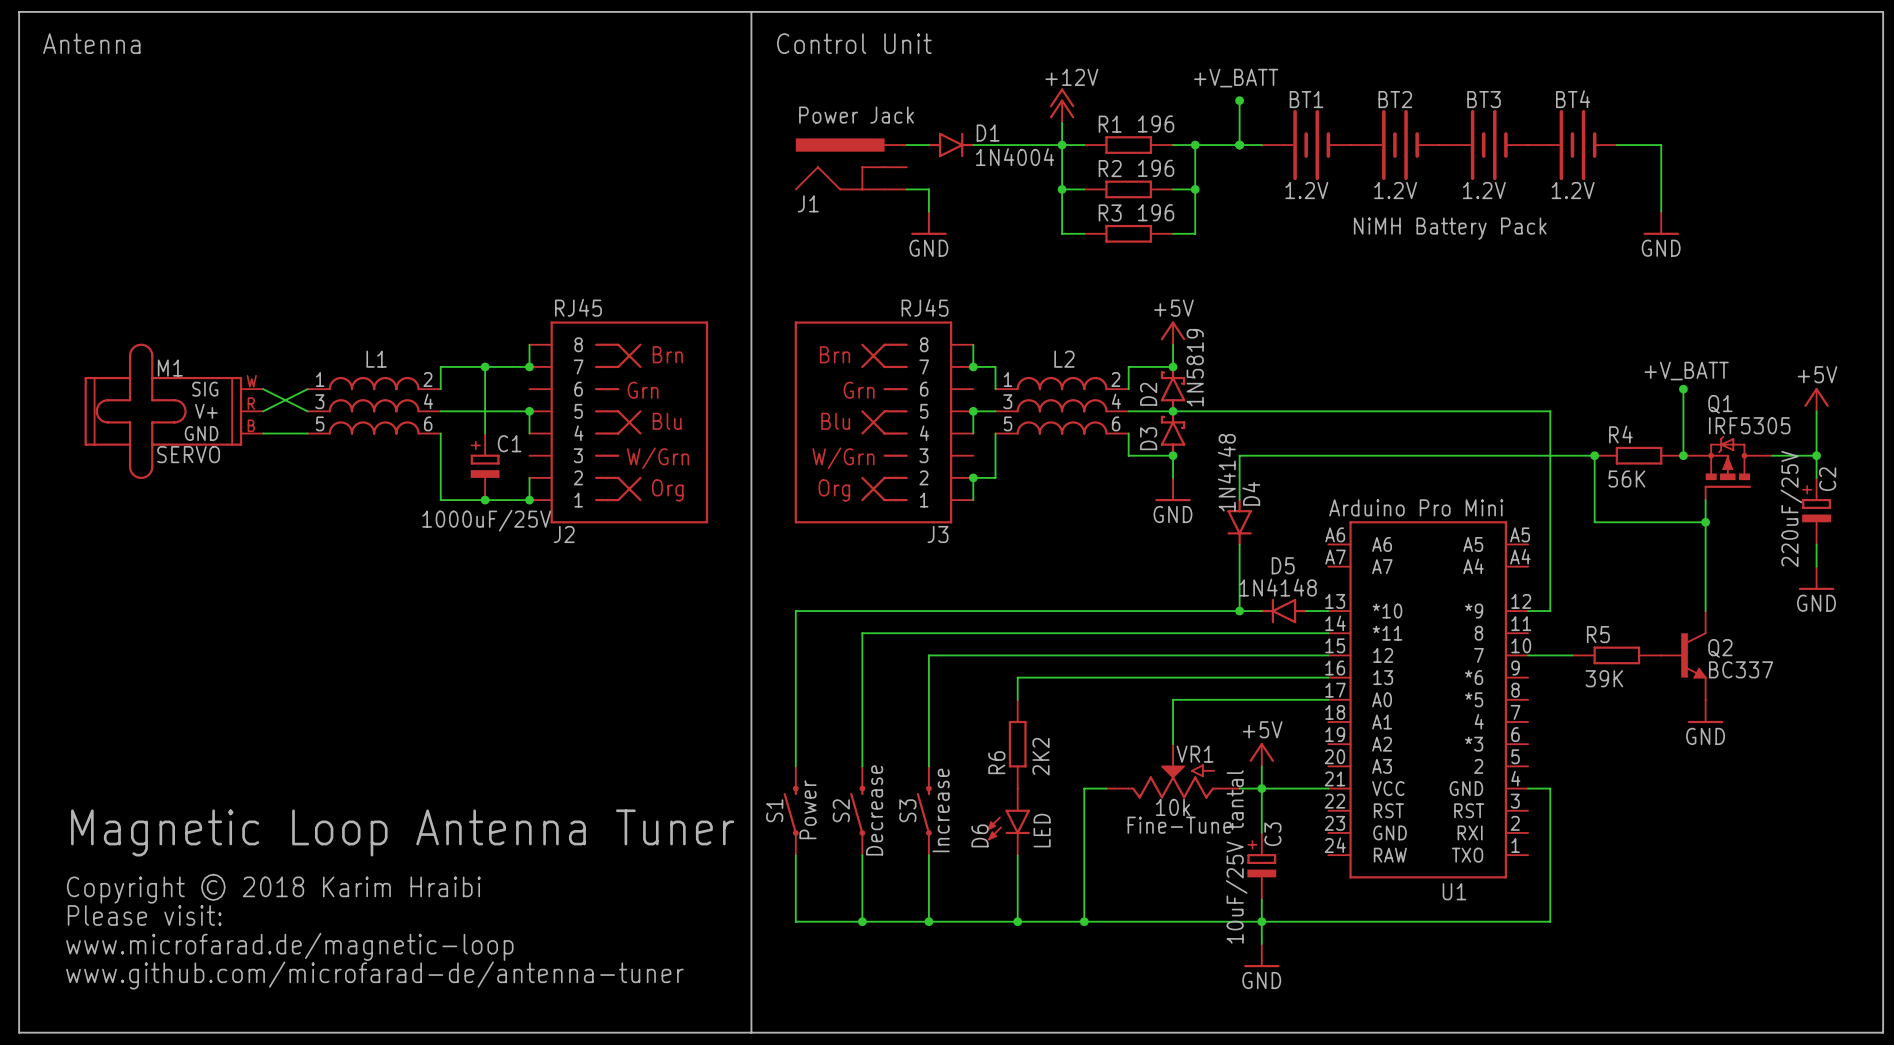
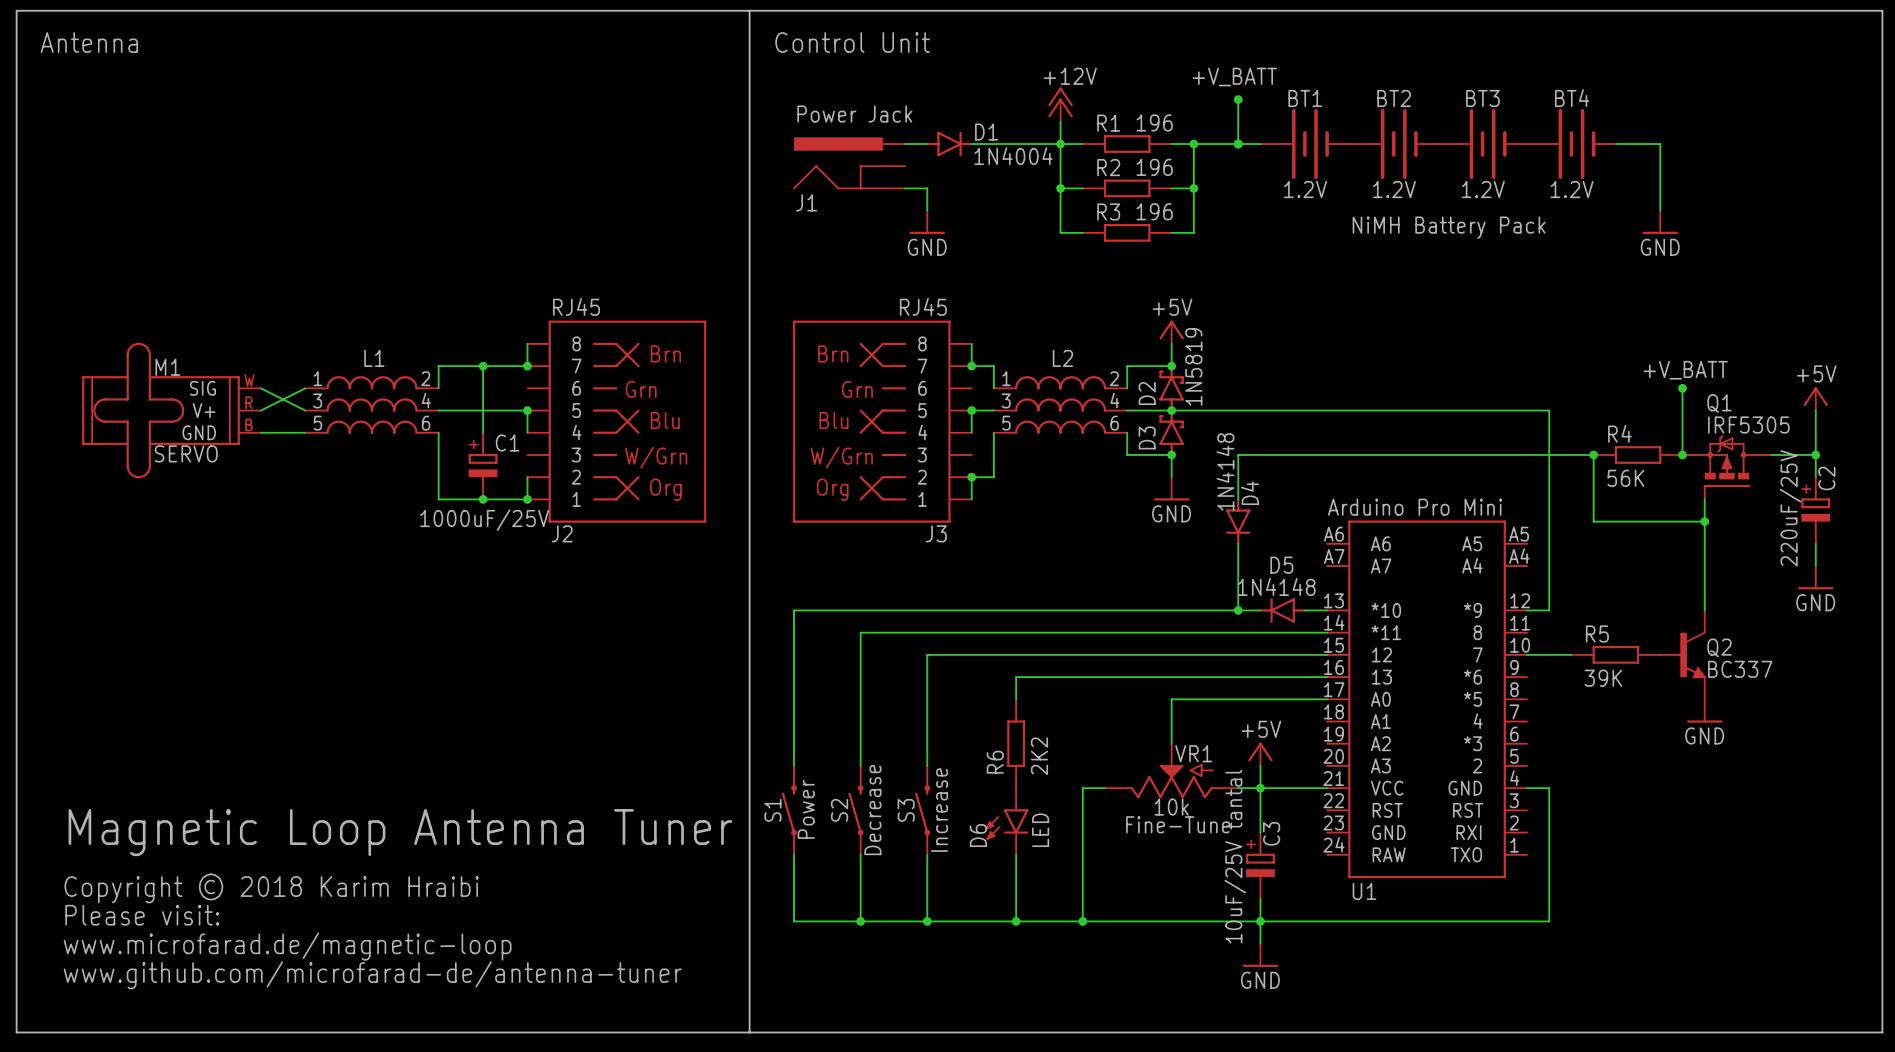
U1 name position: U1 (1454, 891) -> U1 (1364, 891)

